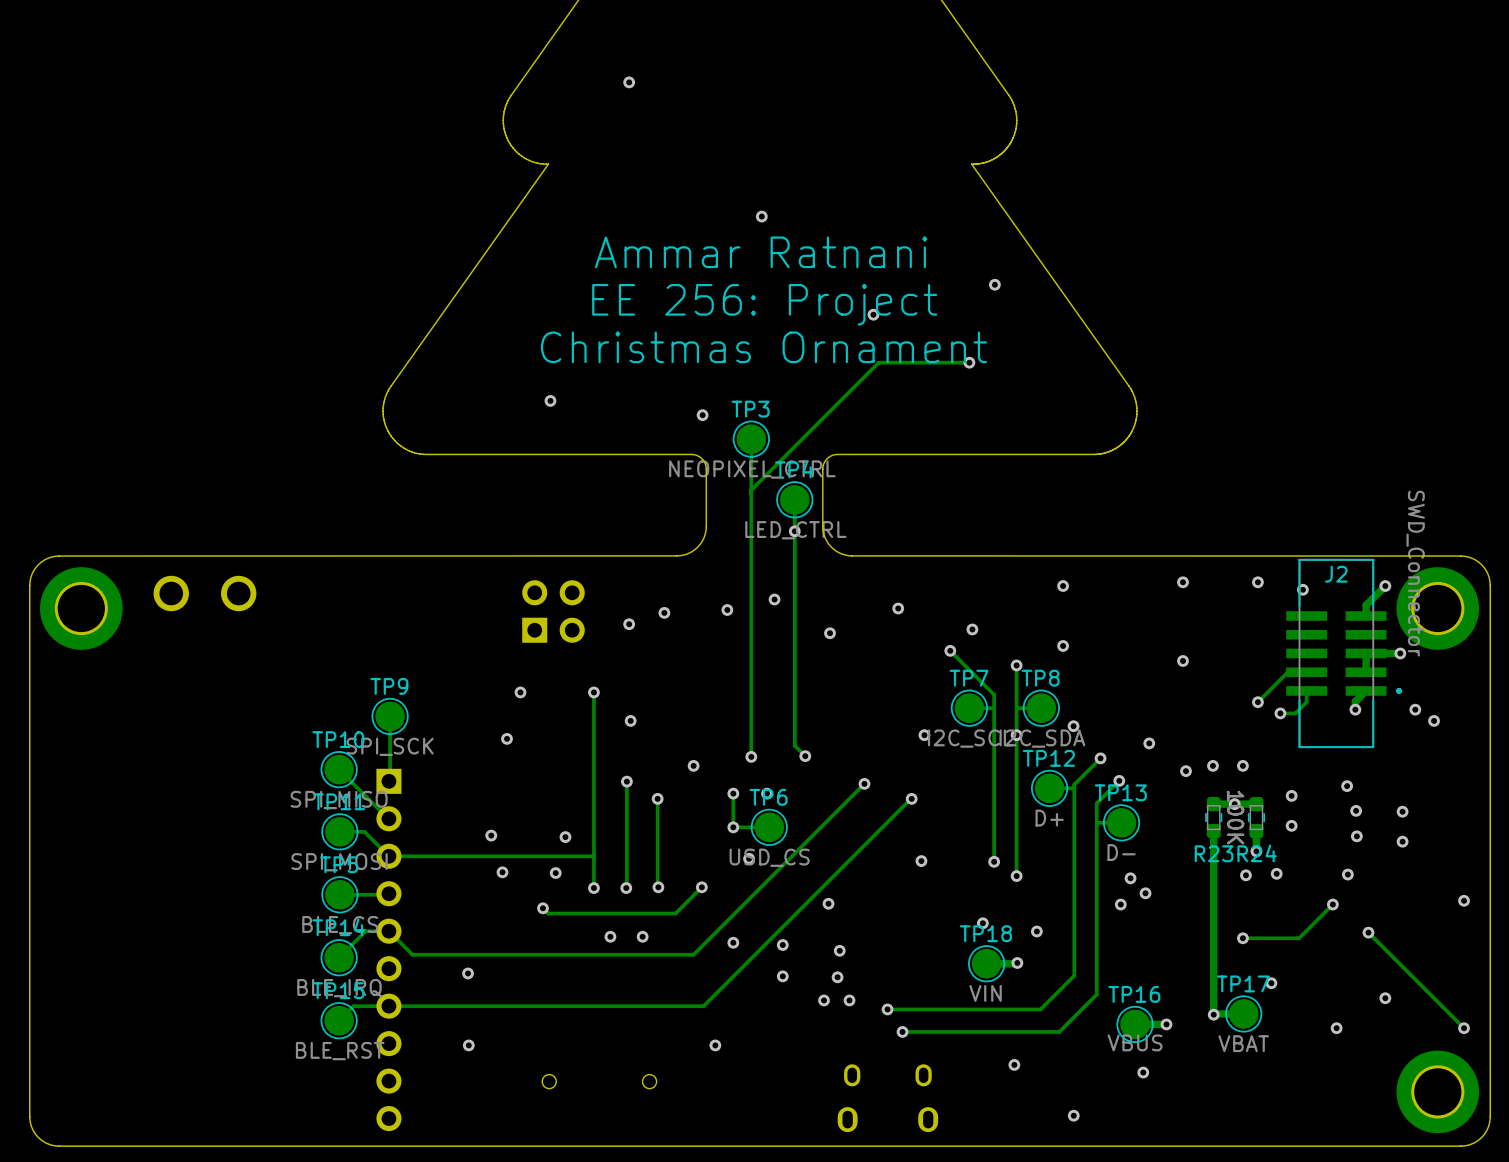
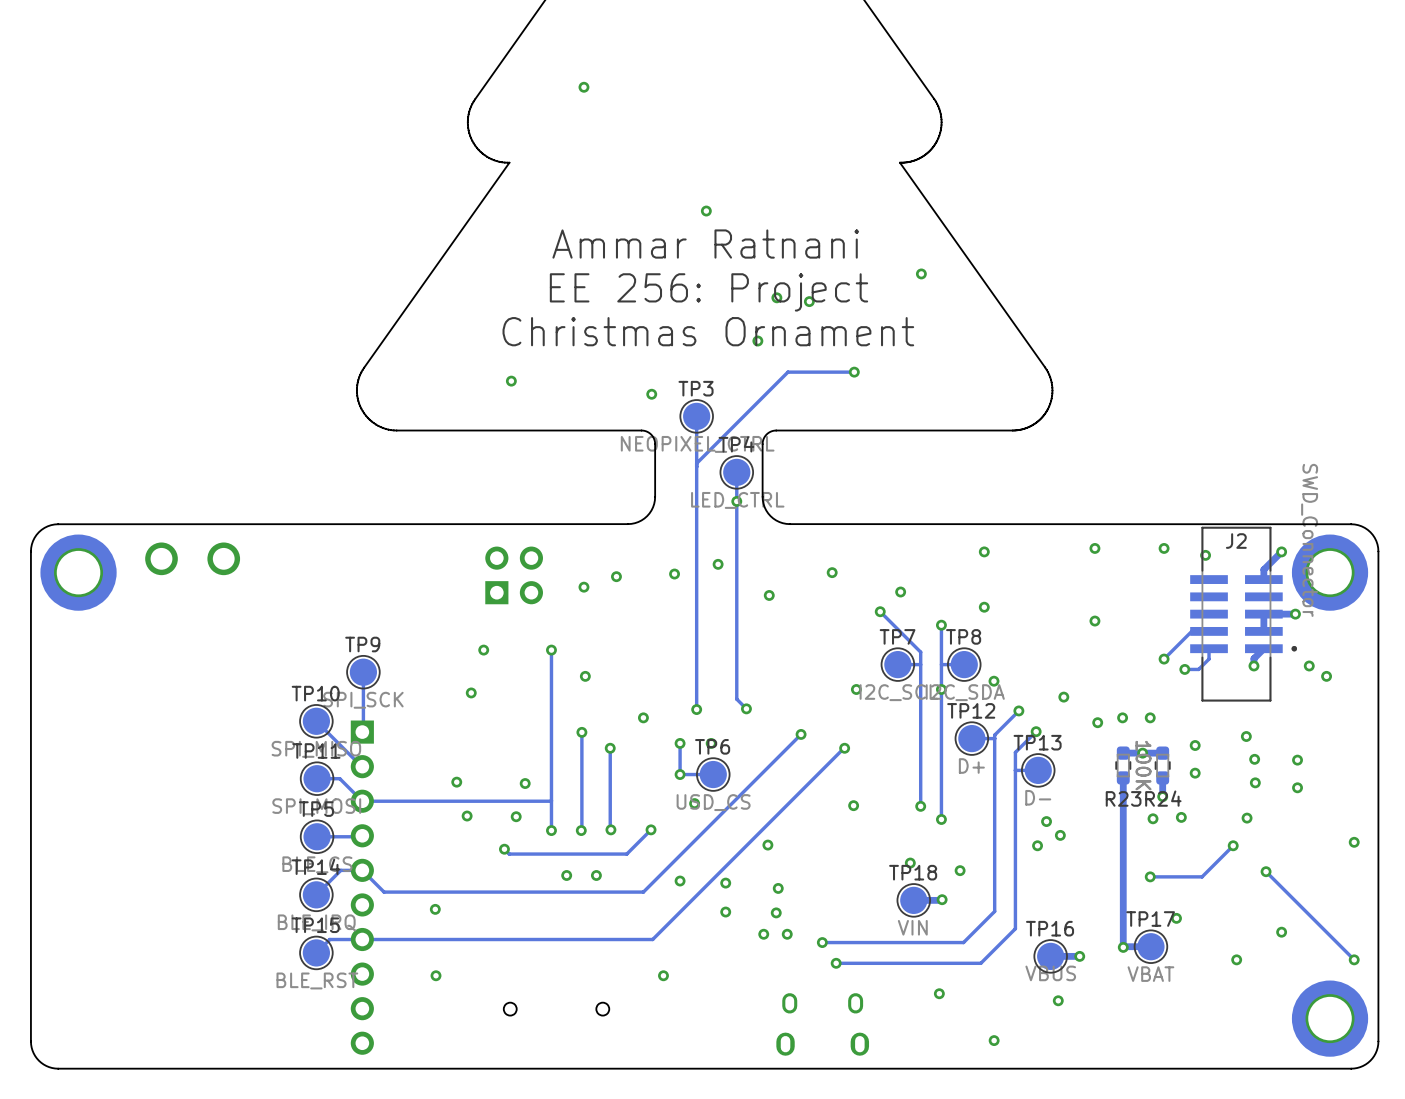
via: none -> (776, 297)
via: none -> (757, 341)
track: (969, 362) (878, 362) (850, 391) -> (854, 372) (787, 372)
via position: (969, 362) -> (854, 372)

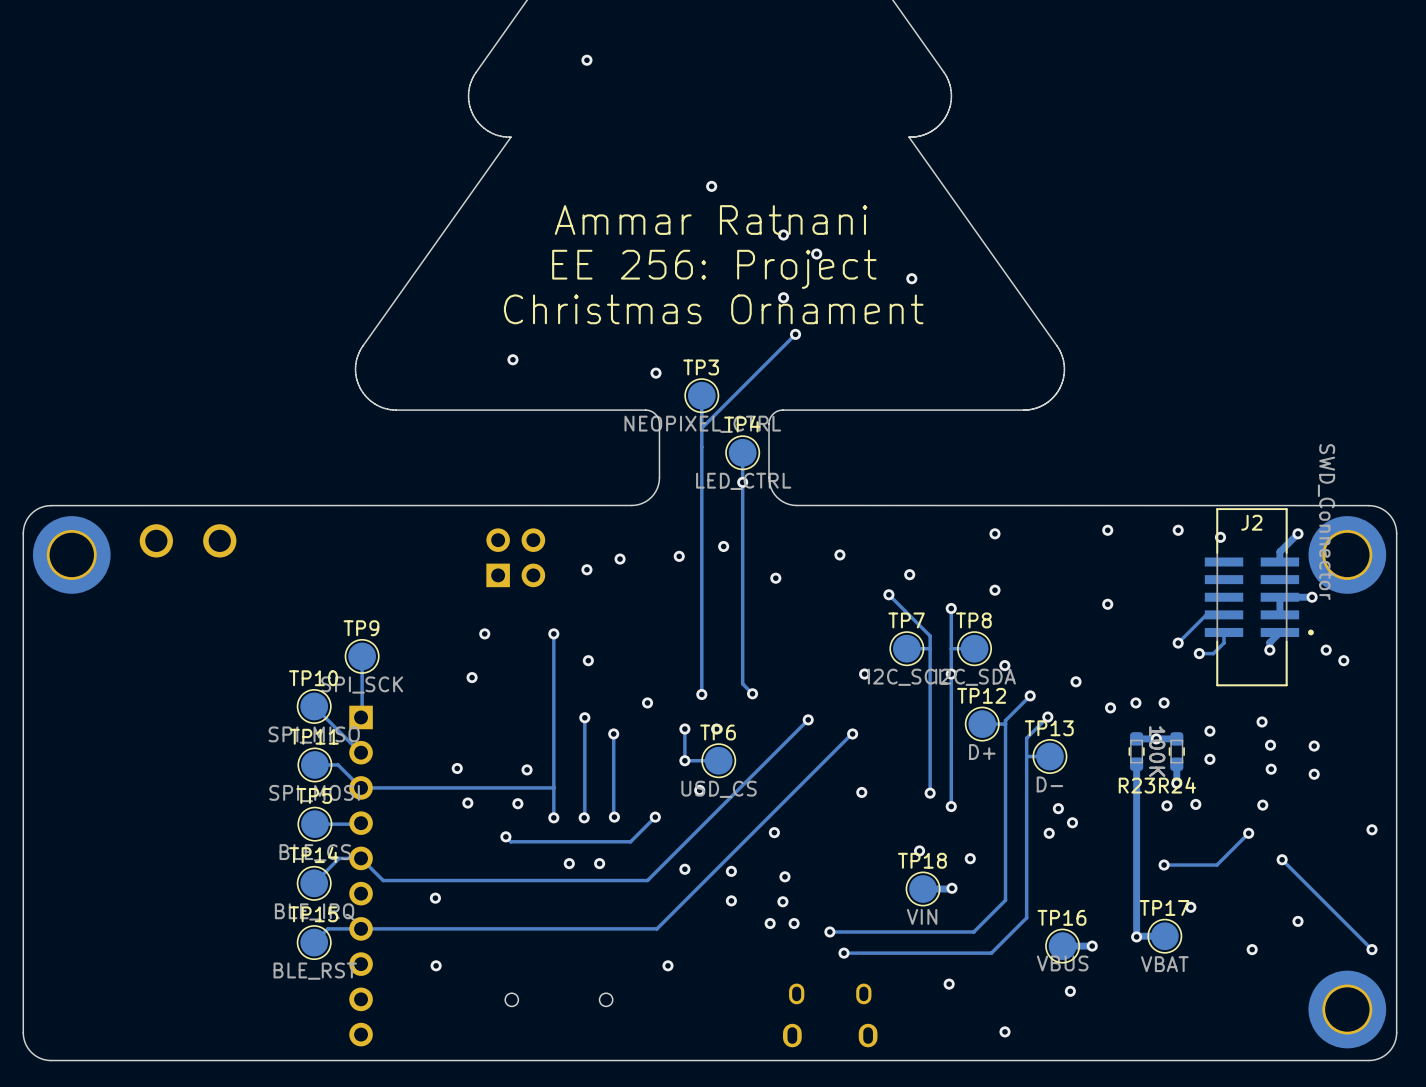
via: none -> (783, 235)
via position: (921, 273) -> (911, 278)
via: none -> (816, 254)
via: (776, 297) -> none
via: (809, 301) -> none
via: none -> (783, 297)
via: (757, 341) -> none
track: none -> (795, 334) (701, 428)
via: none -> (795, 334)
track: (854, 372) (787, 372) (696, 463) -> none
via: (854, 372) -> none

